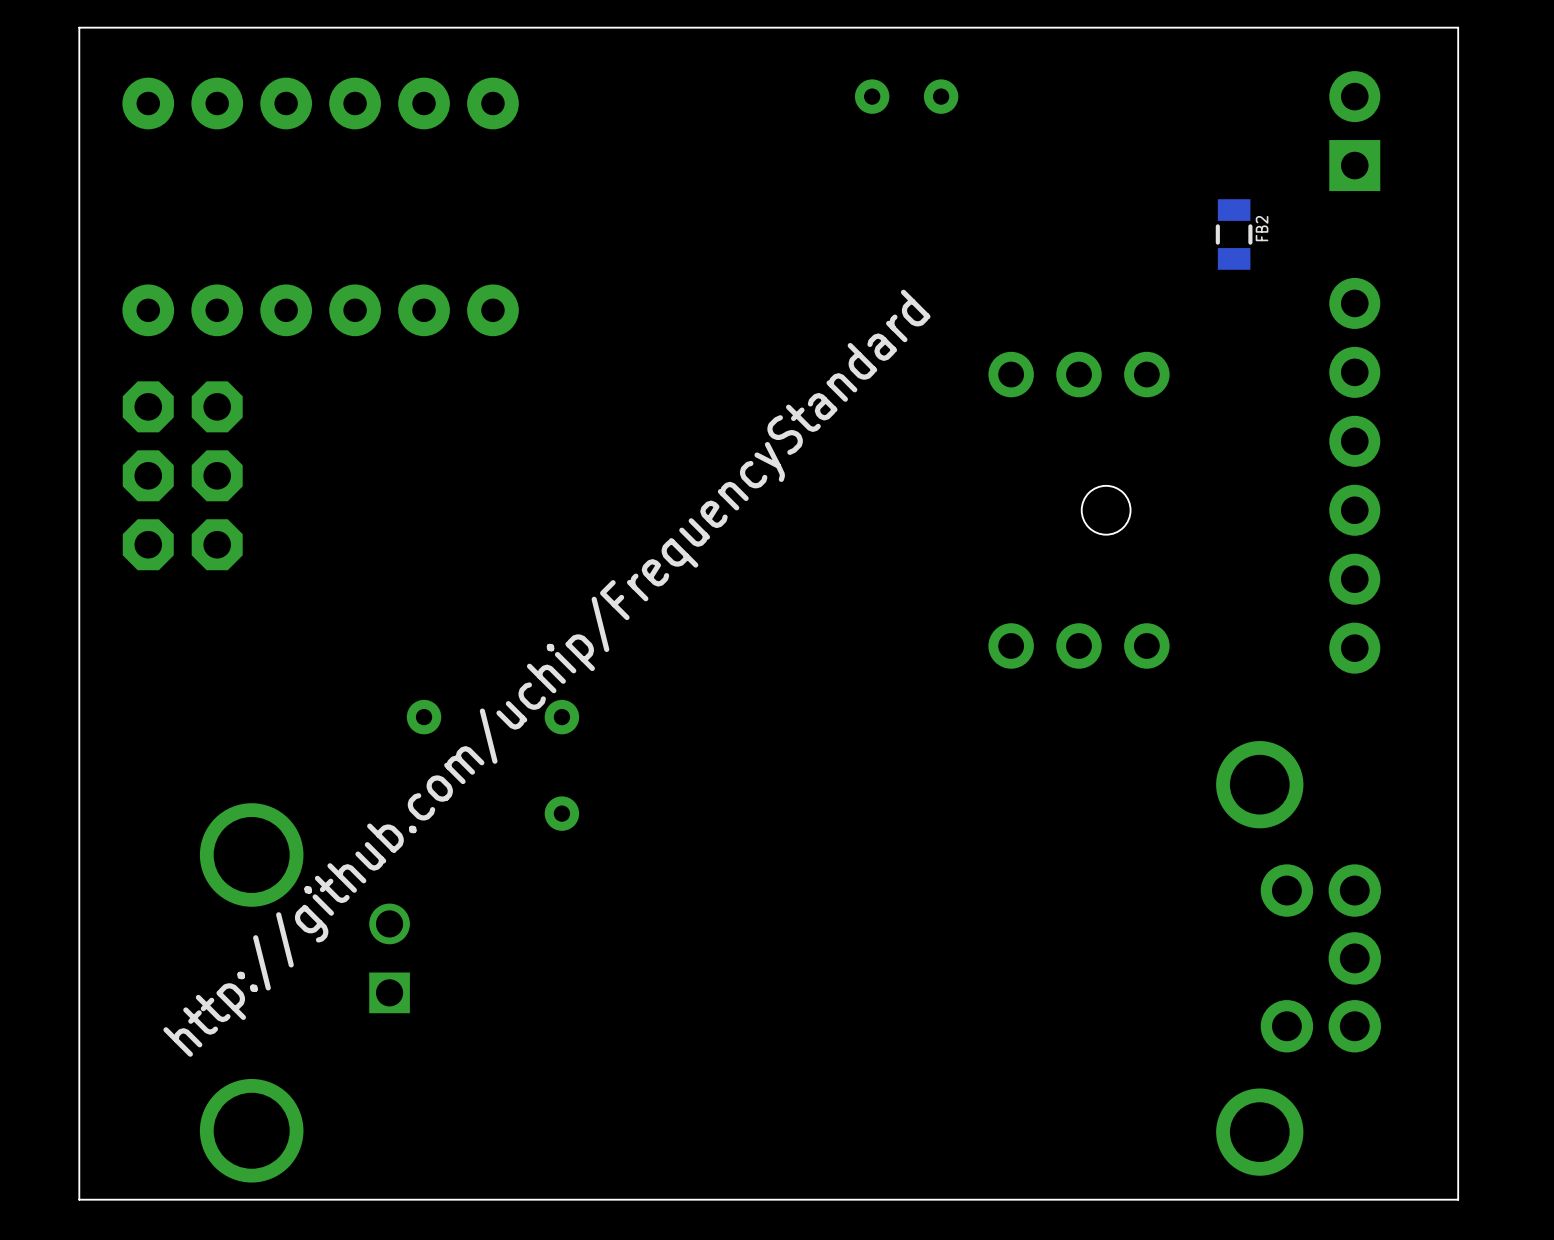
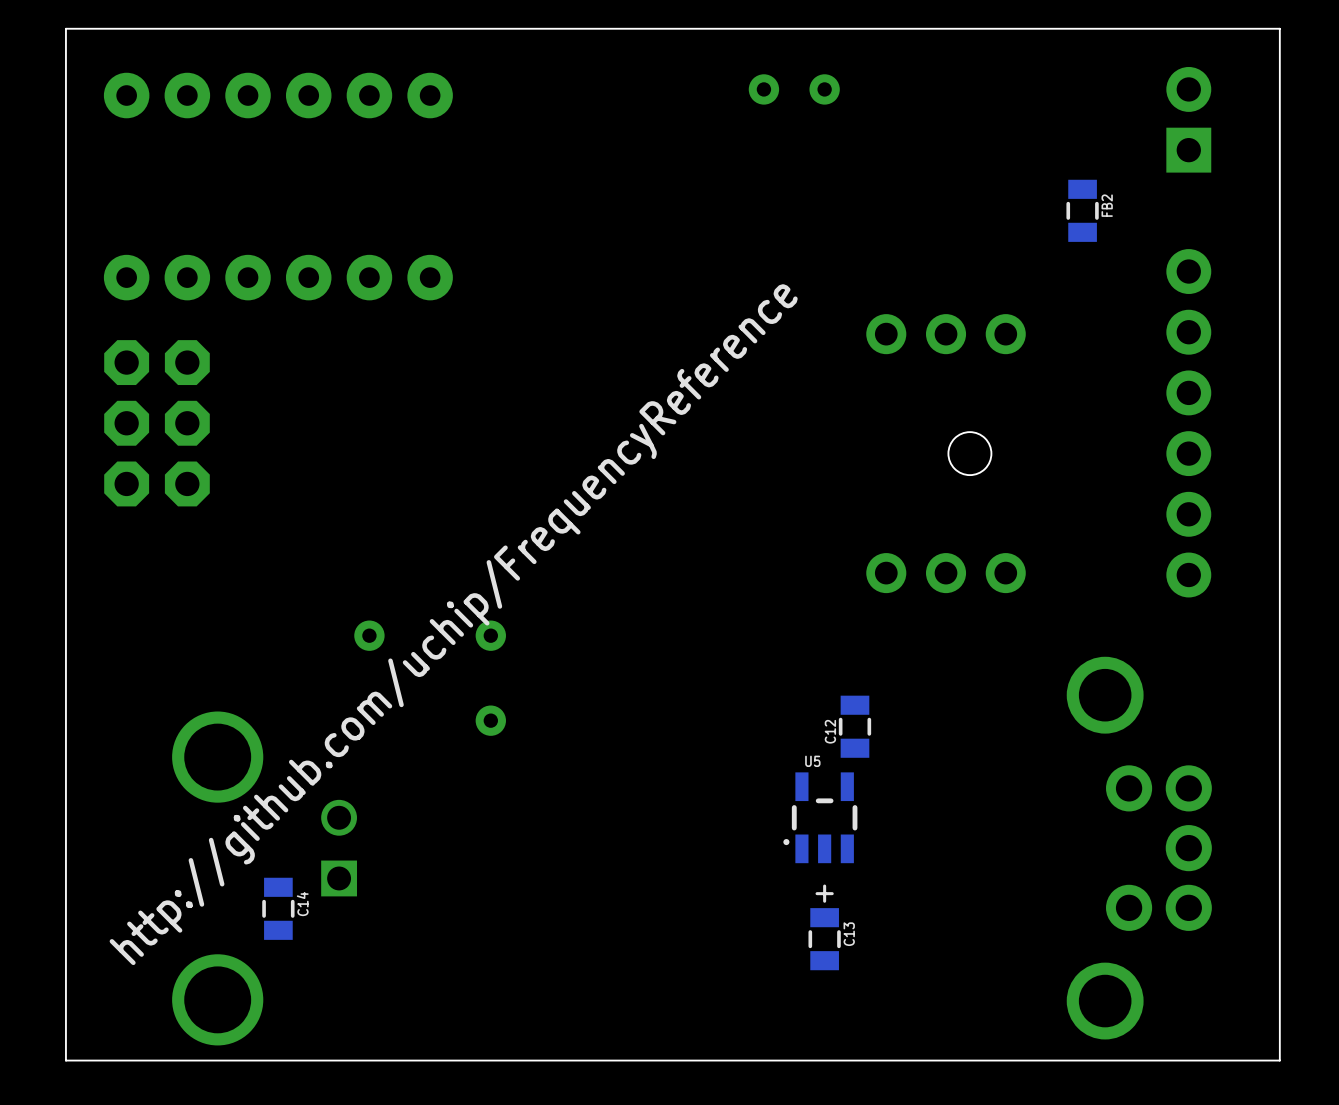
text: http://github.com/uchip/FrequencyStandard (546, 673) -> http://github.com/uchip/FrequencyReference (453, 624)
C12: none -> (854, 726)
U5: none -> (820, 817)
C14: none -> (278, 908)
C13: none -> (824, 927)

